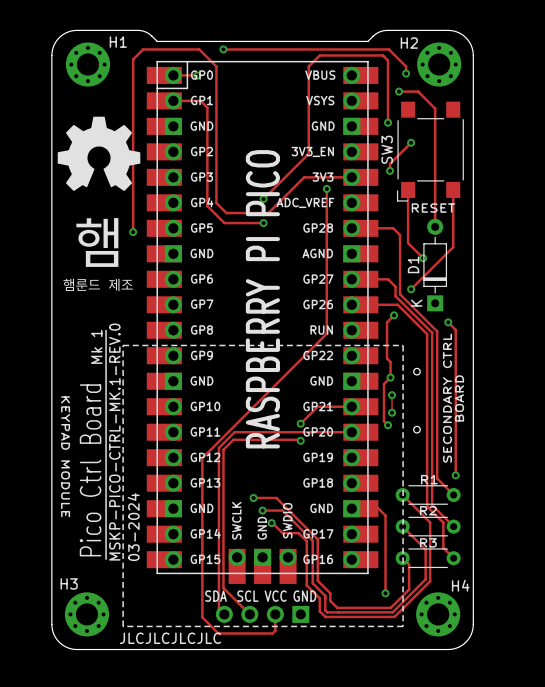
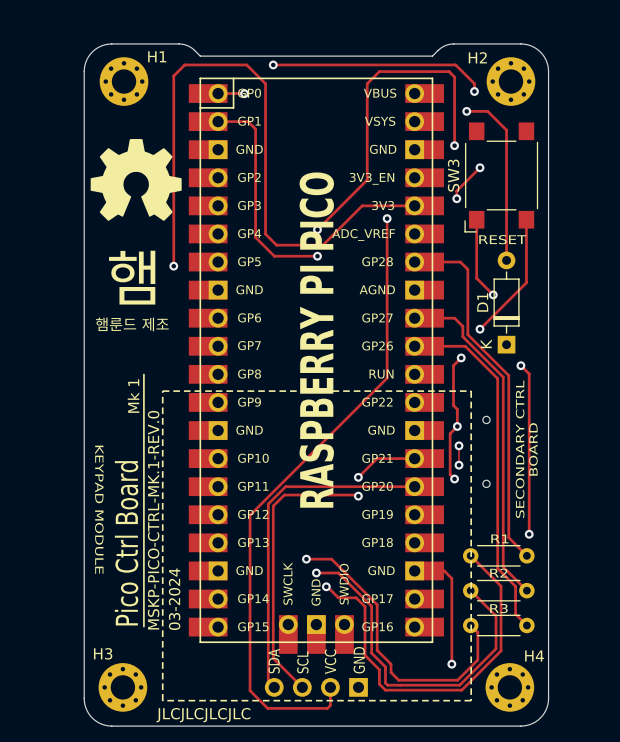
text: none -> VCC (330, 661)
text: SDA (216, 596) -> none
text: SCL (247, 596) -> SDA (274, 661)
text: VCC (275, 596) -> SCL (302, 662)
text rotation: 0° (304, 596) -> 90° counterclockwise (359, 660)

